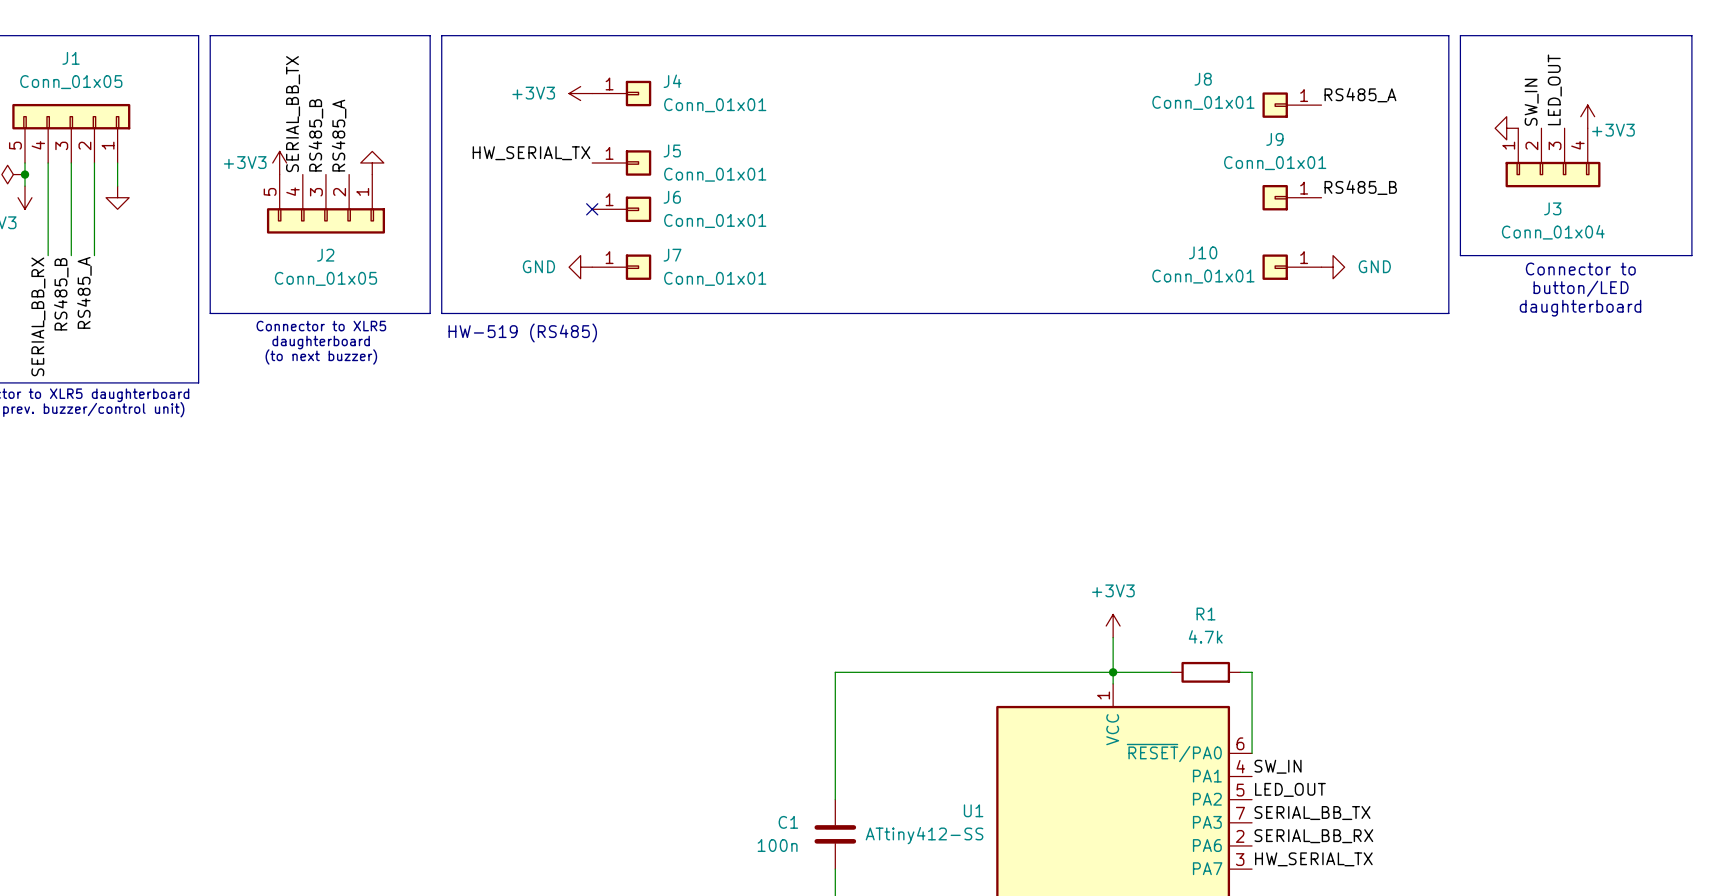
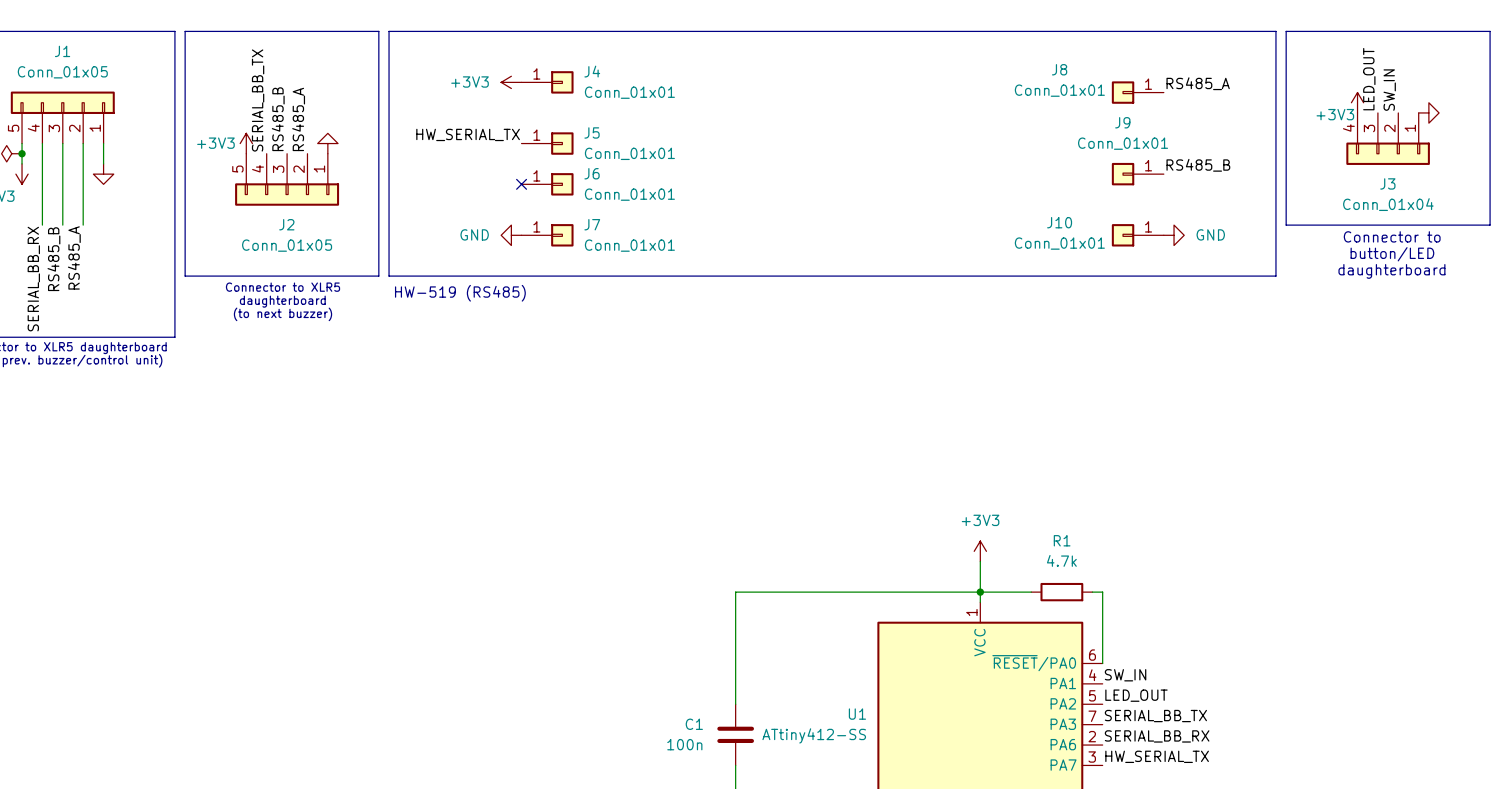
label position: SW_IN (1531, 102) -> SW_IN (1389, 90)
power symbol position: +3V3 (1587, 116) -> +3V3 (1357, 102)
power symbol rotation: 0° (1506, 128) -> 180° (1428, 112)
power symbol position: (1506, 128) -> (1428, 112)
power symbol text position: +3V3 (1613, 130) -> +3V3 (1335, 114)
J3 flip: as is (1553, 174) -> left-right (1388, 153)

